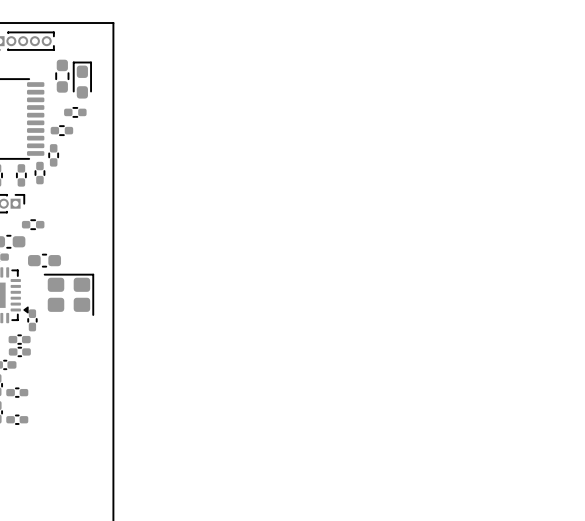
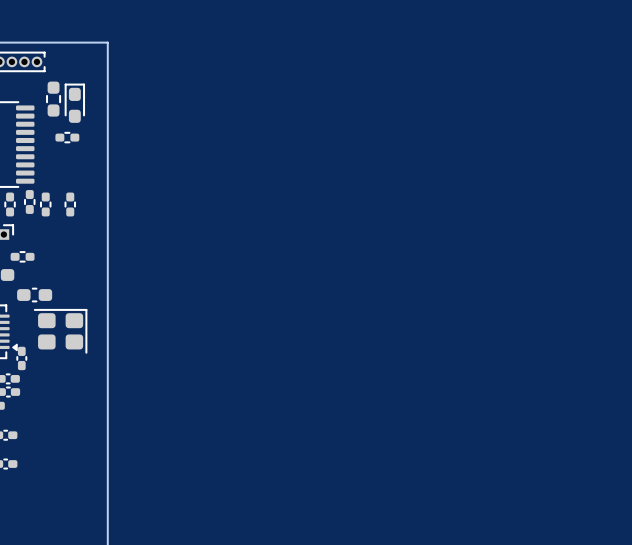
part: (61, 130) -> none
part: (53, 155) -> none
part: none -> (45, 204)
part: none -> (70, 204)

